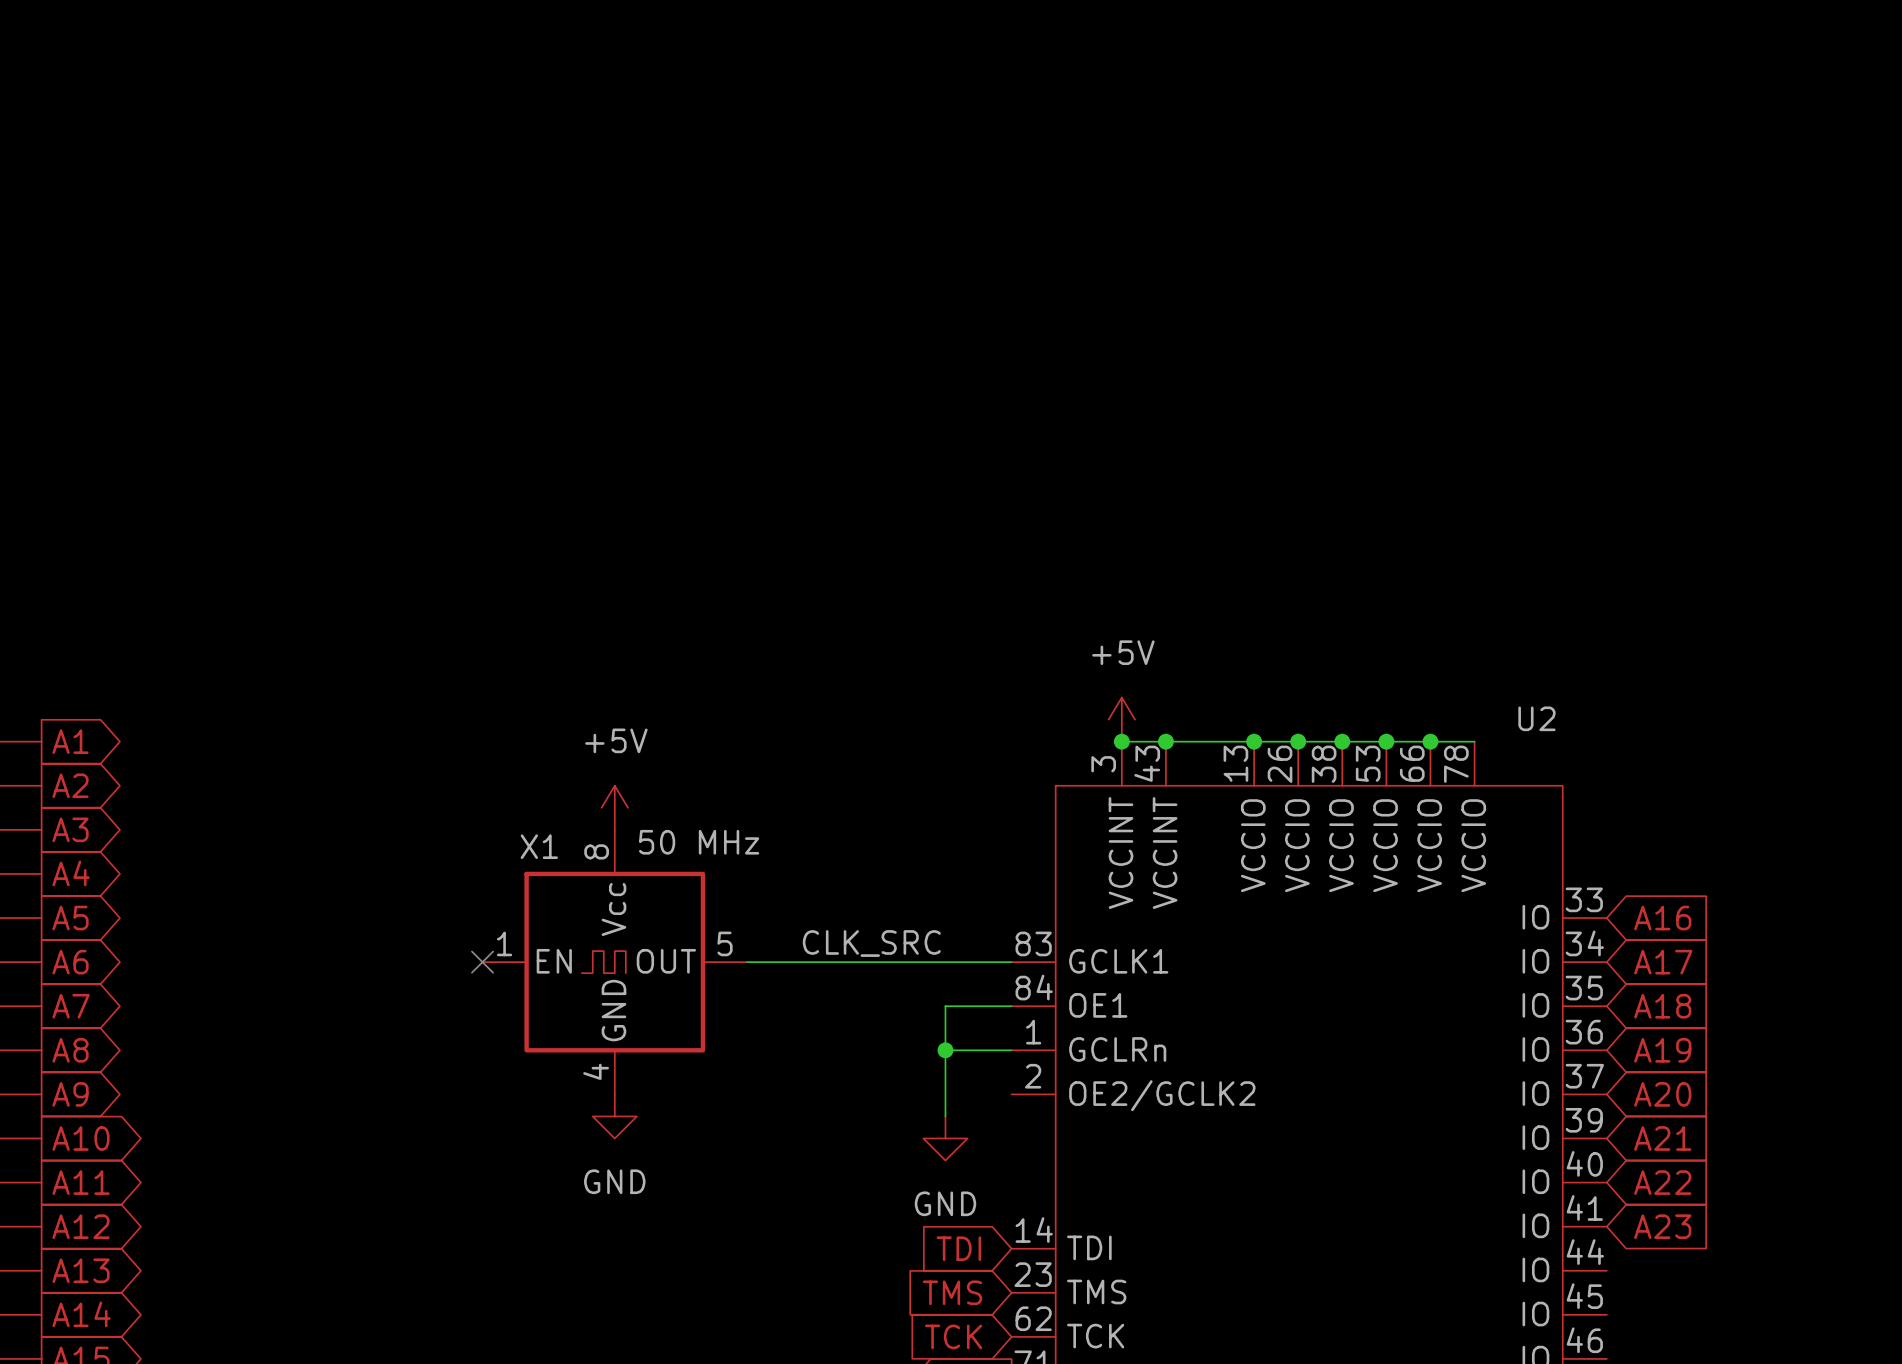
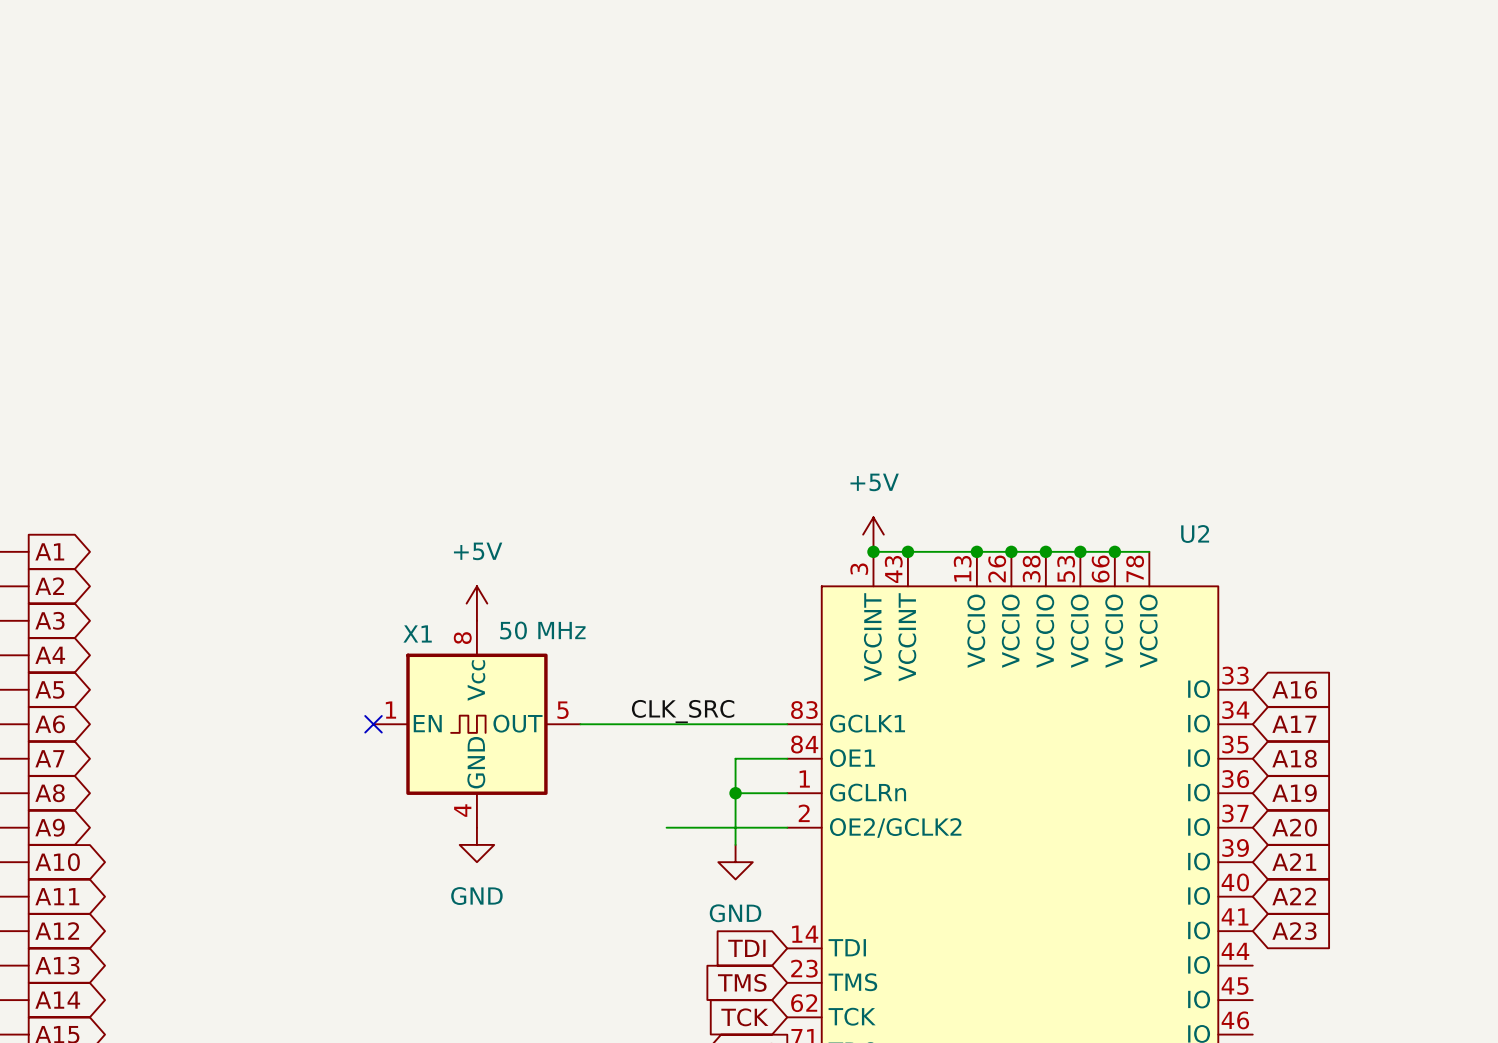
wire: none -> (666, 827) (787, 827)

